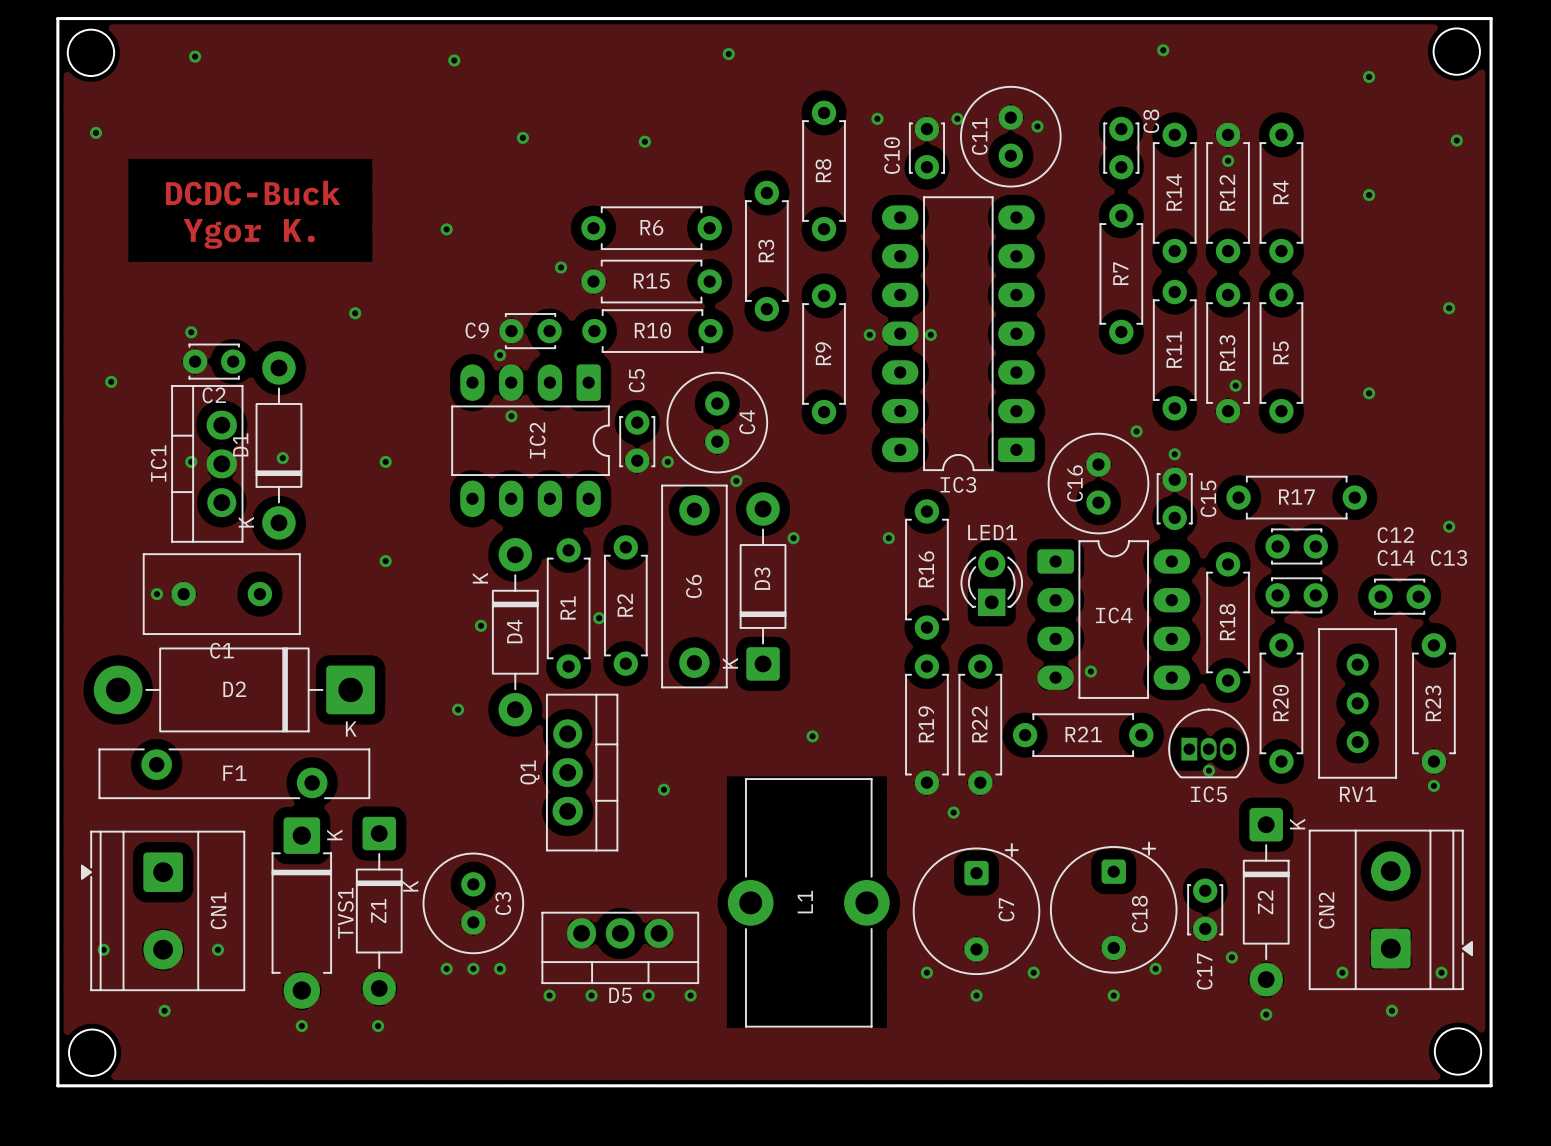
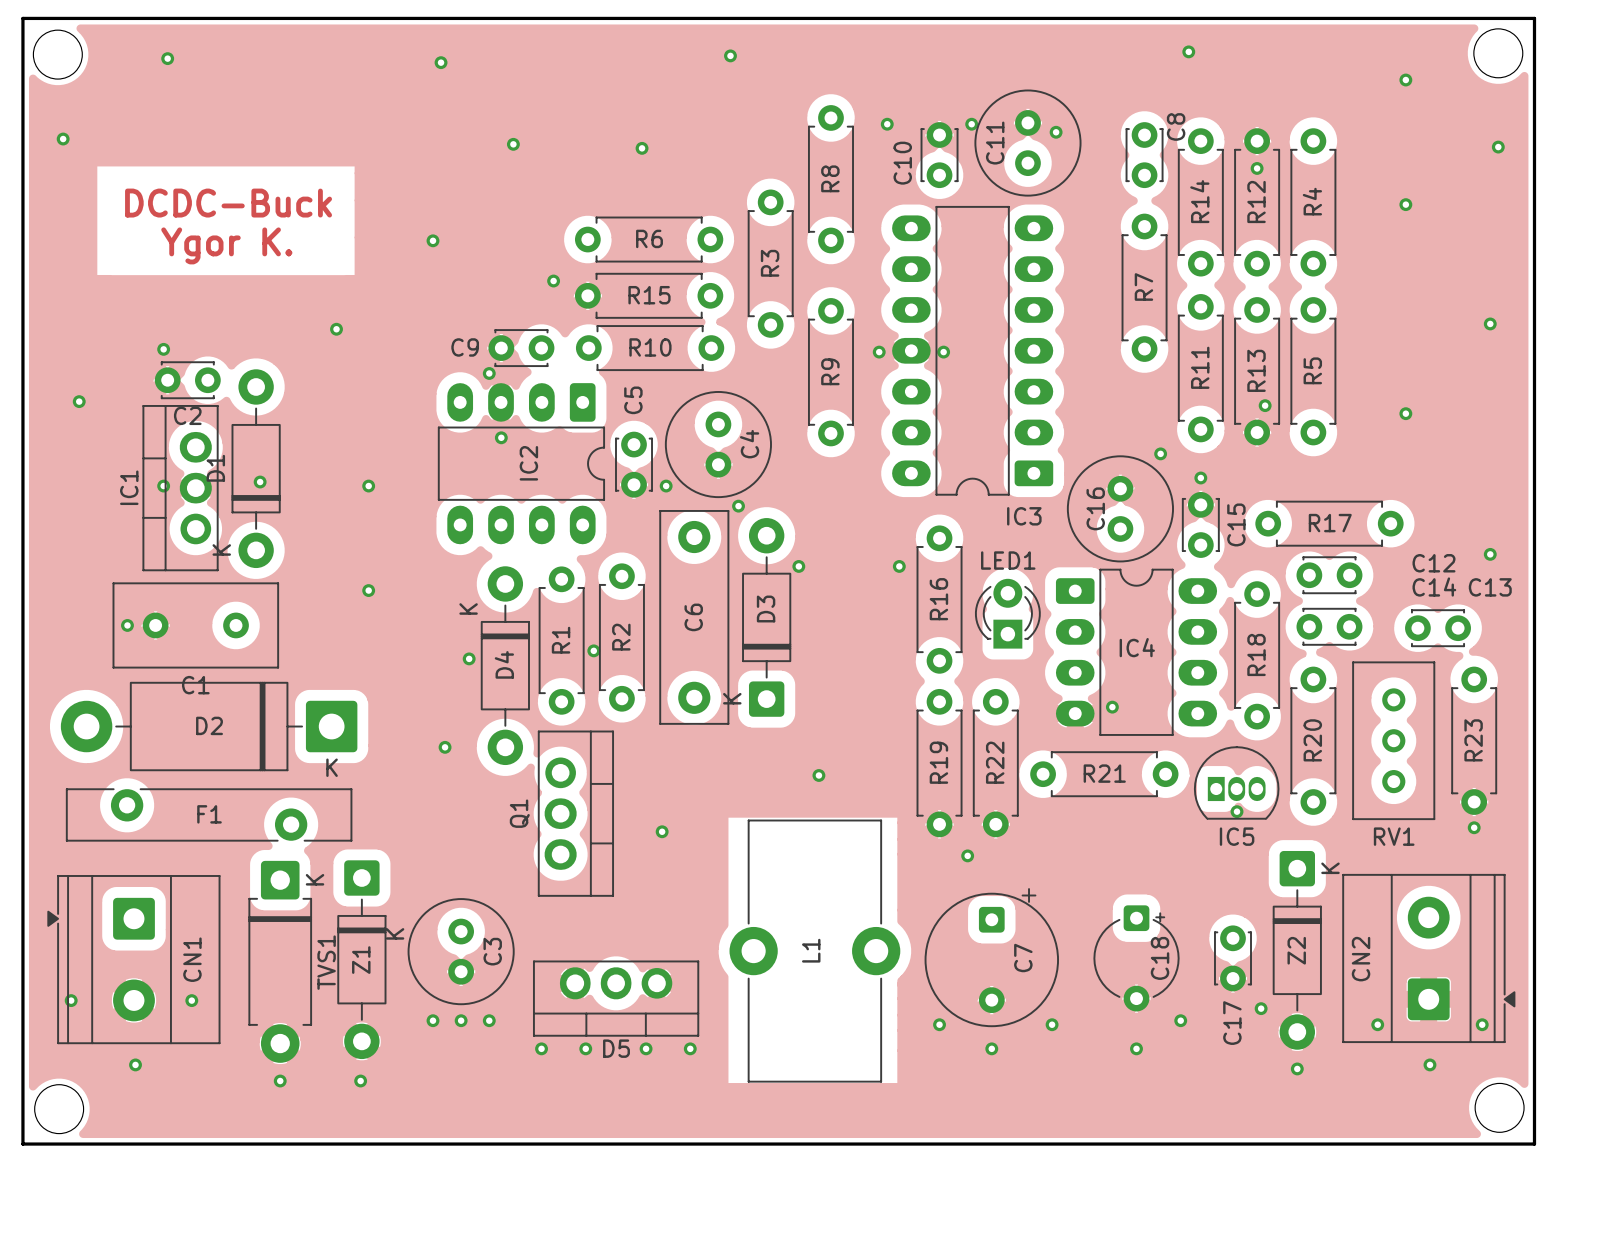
IC3 name position: IC3 (958, 484) -> IC3 (1024, 516)
C18 footprint: [1049, 841, 1178, 974] -> [1093, 905, 1180, 1012]

